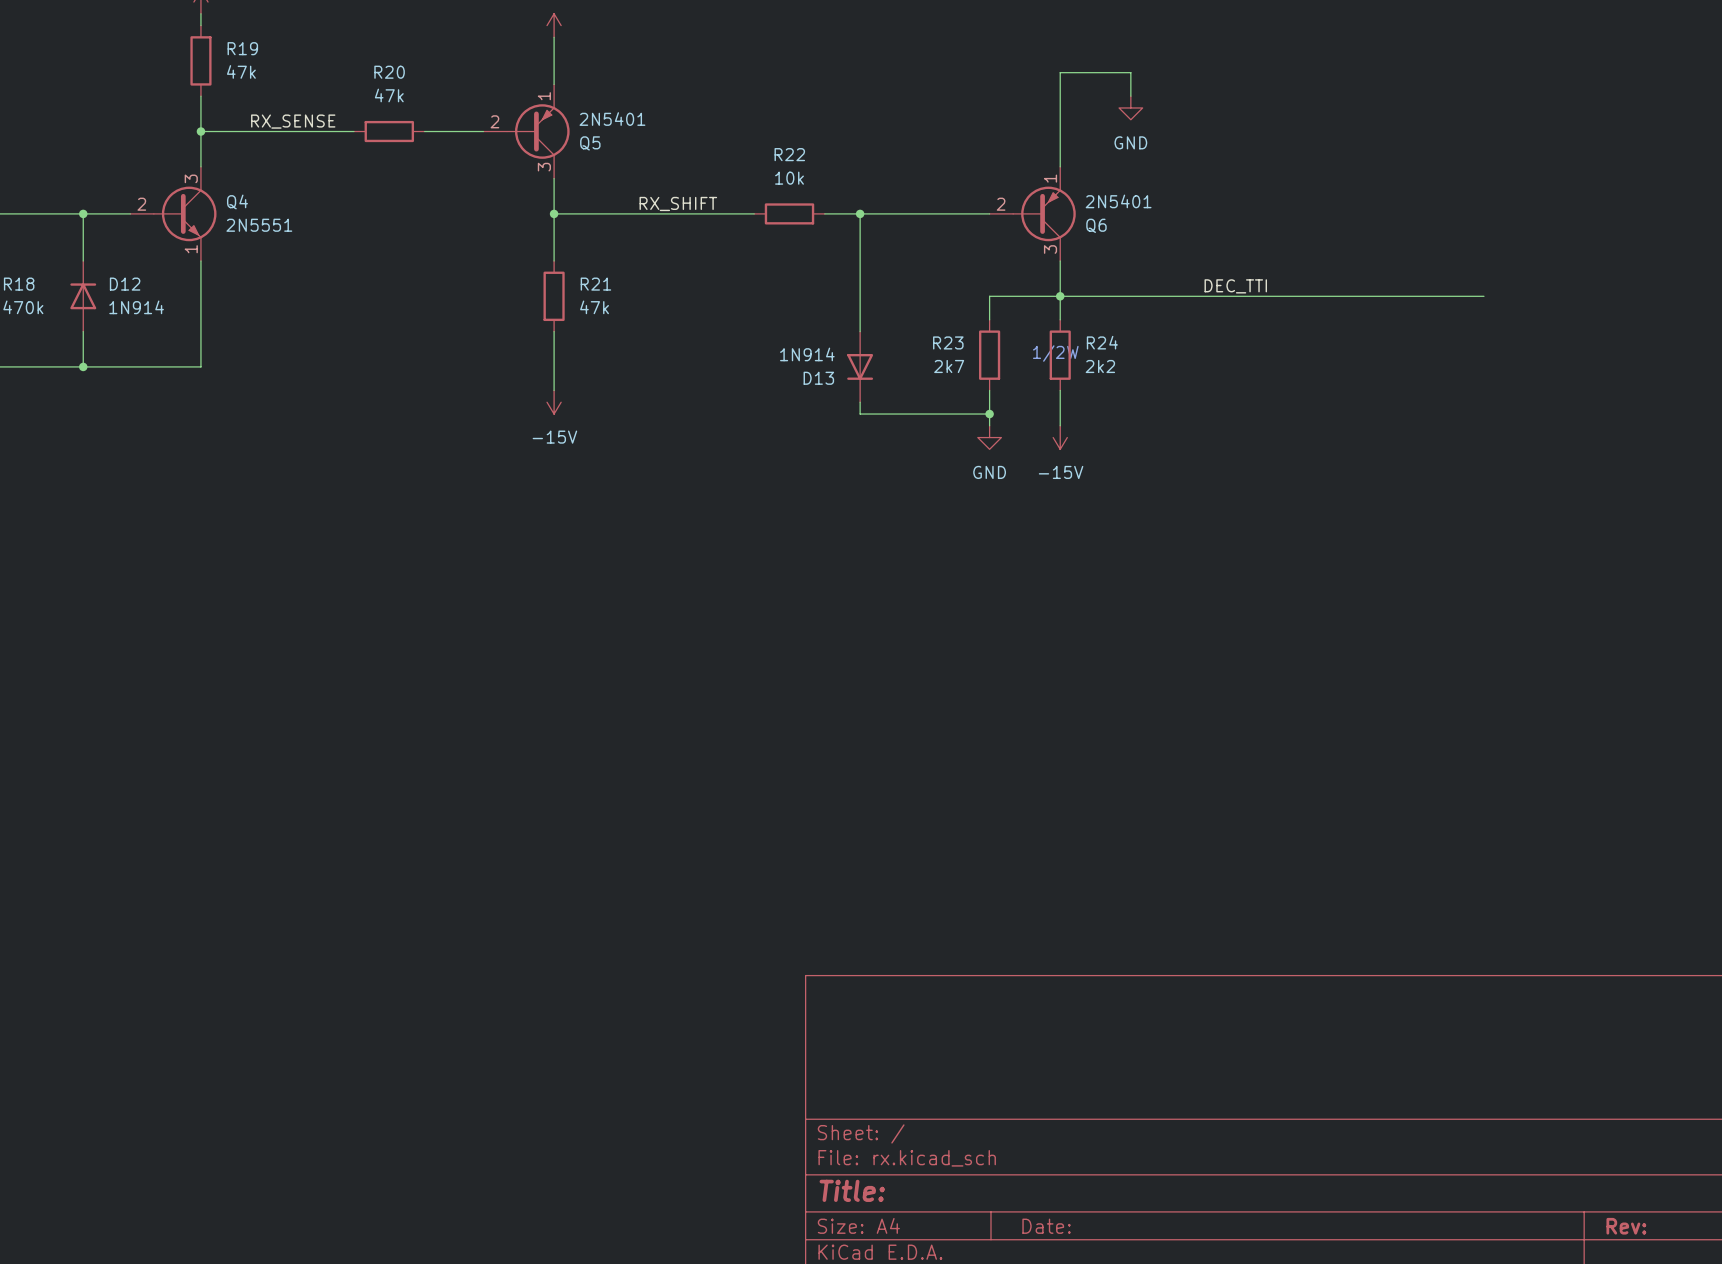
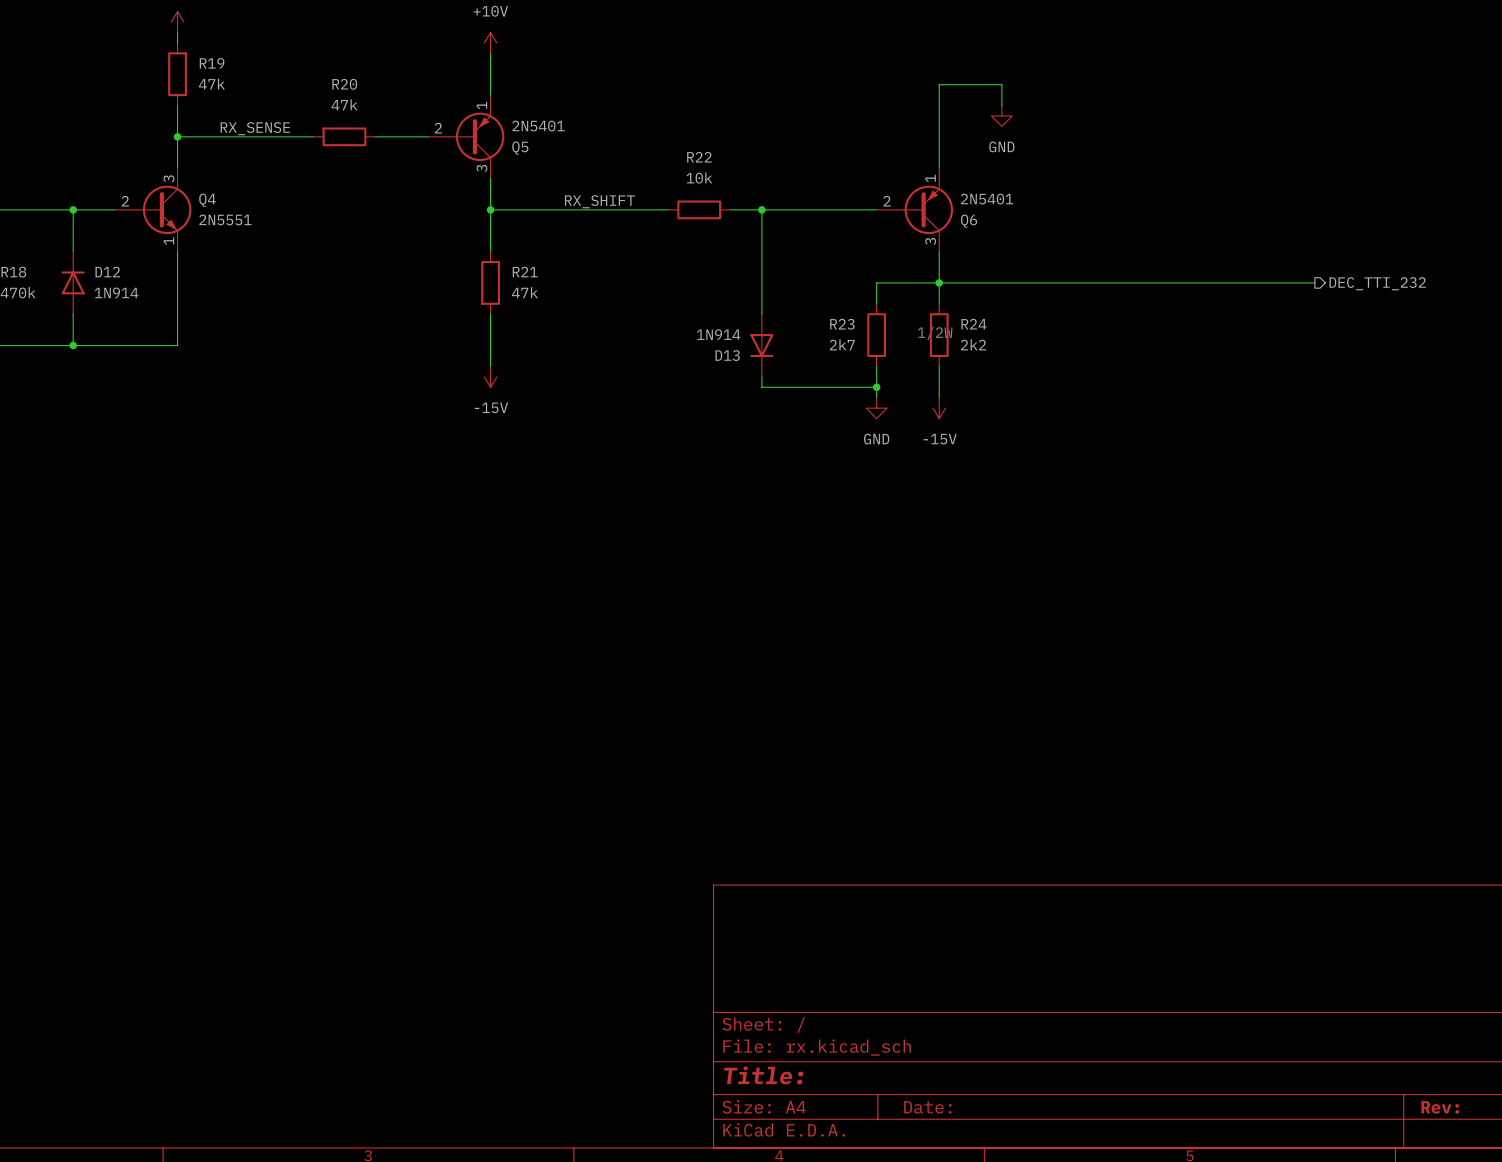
label: DEC_TTI (1235, 286) -> none
hierarchical label: none -> DEC_TTI_232 (1377, 283)

